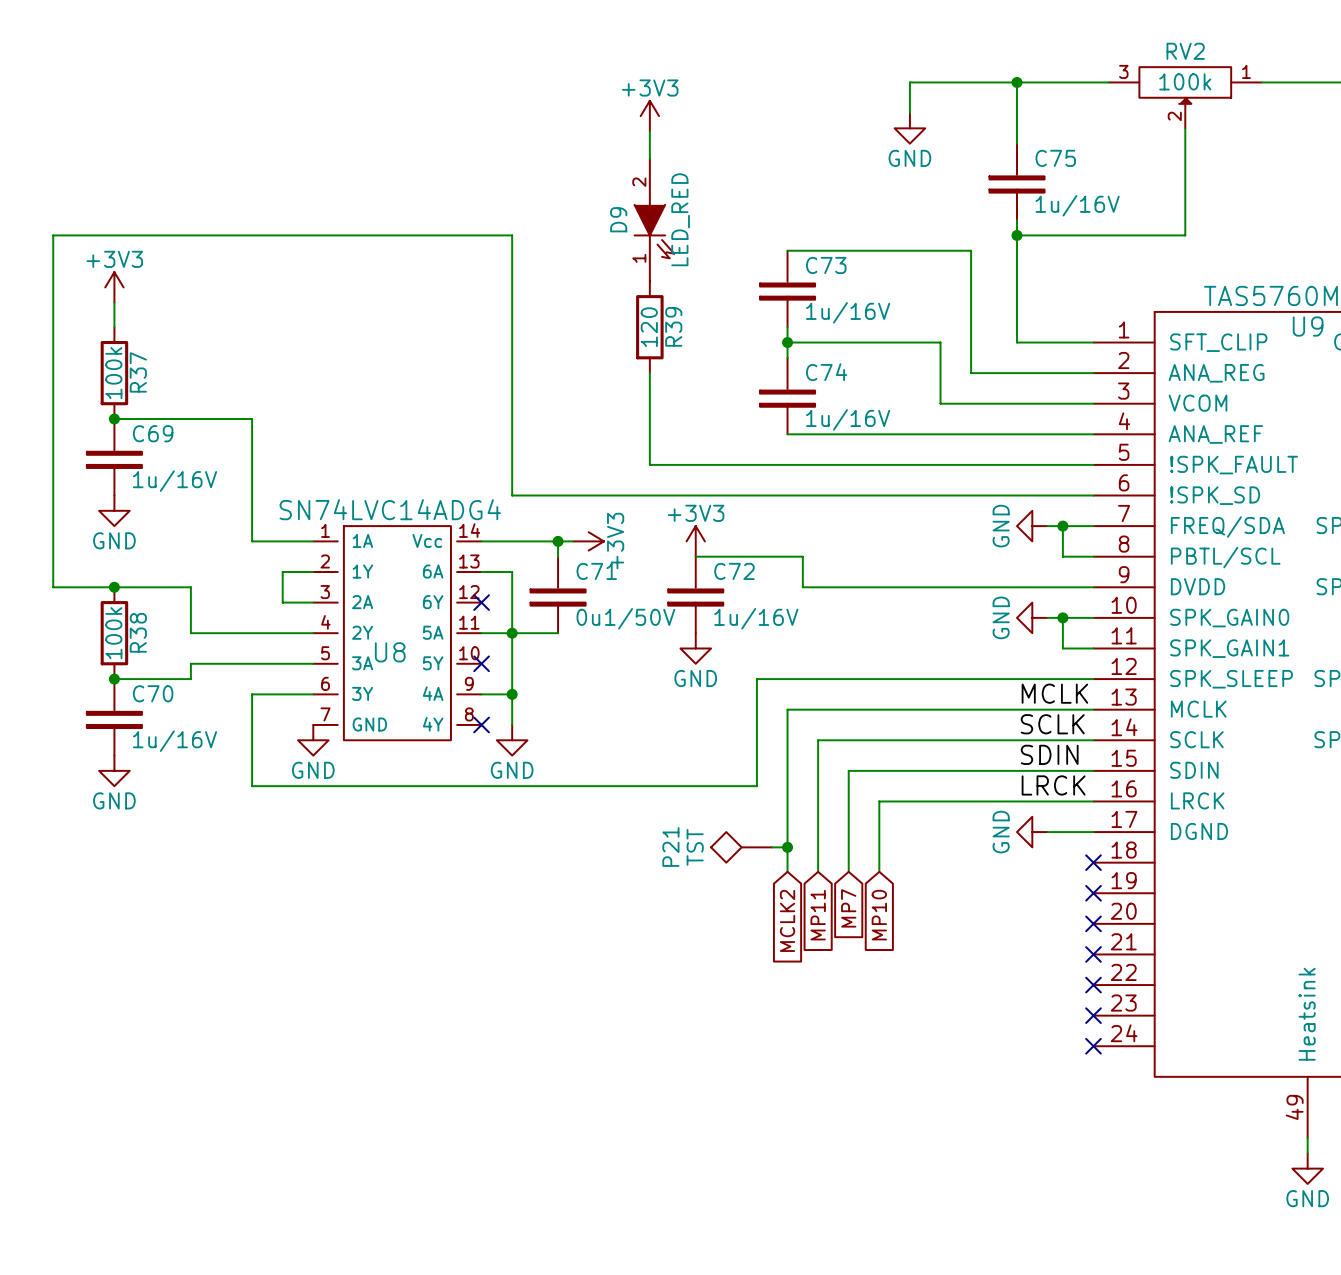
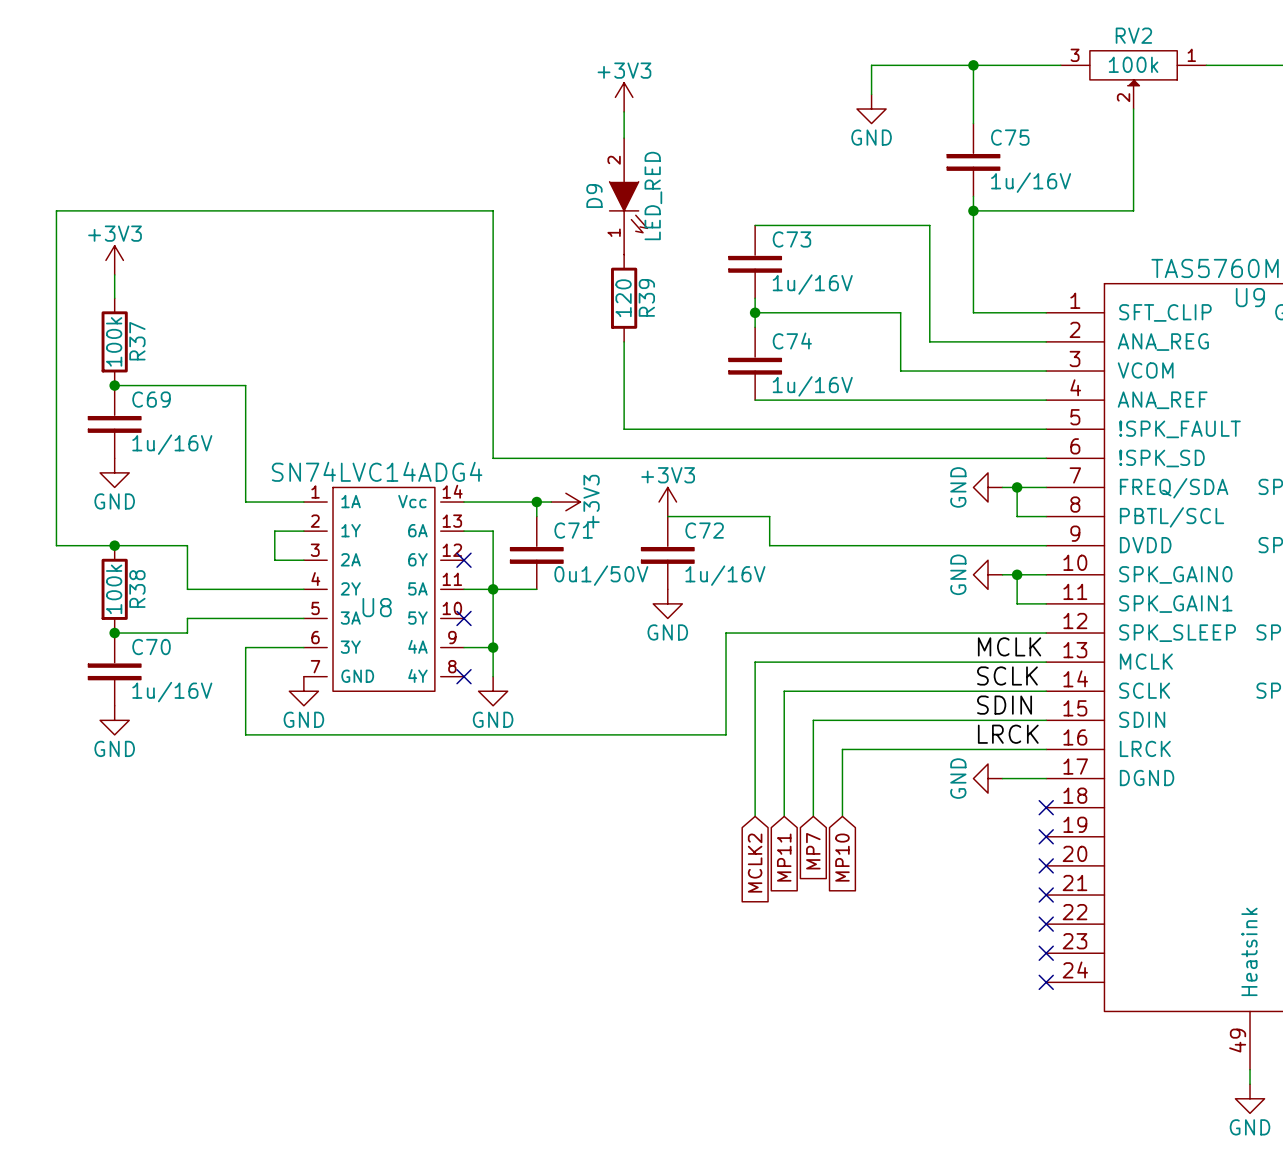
P21: TST (741, 847) -> none
wire: (772, 847) (787, 847) -> none
junction: (787, 847) -> none

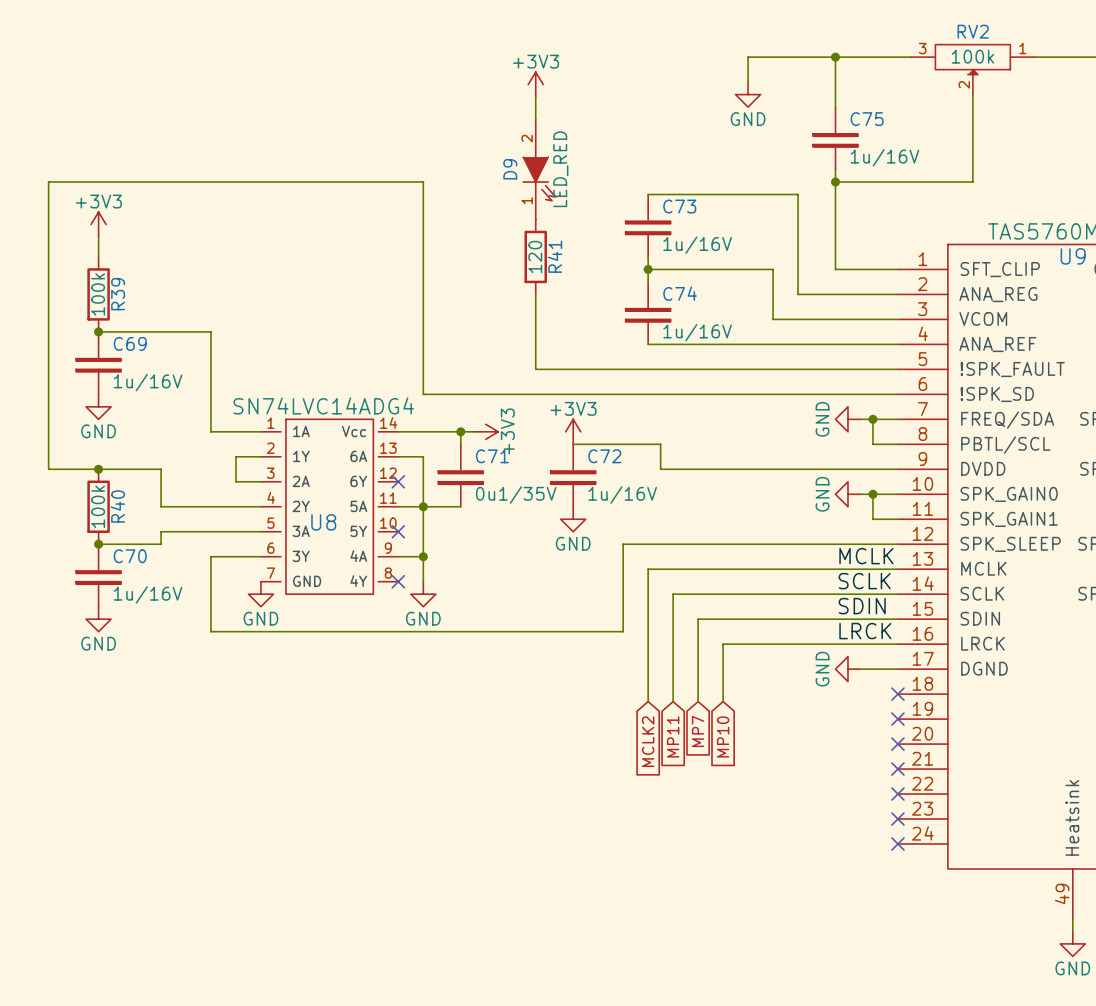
R39 name: R39 (646, 297) -> R41 (554, 256)
R37 name: R37 (137, 341) -> R39 (118, 294)
C71 value: 0u1/50V (601, 575) -> 0u1/35V (516, 495)
R38 name: R38 (137, 589) -> R40 (117, 506)

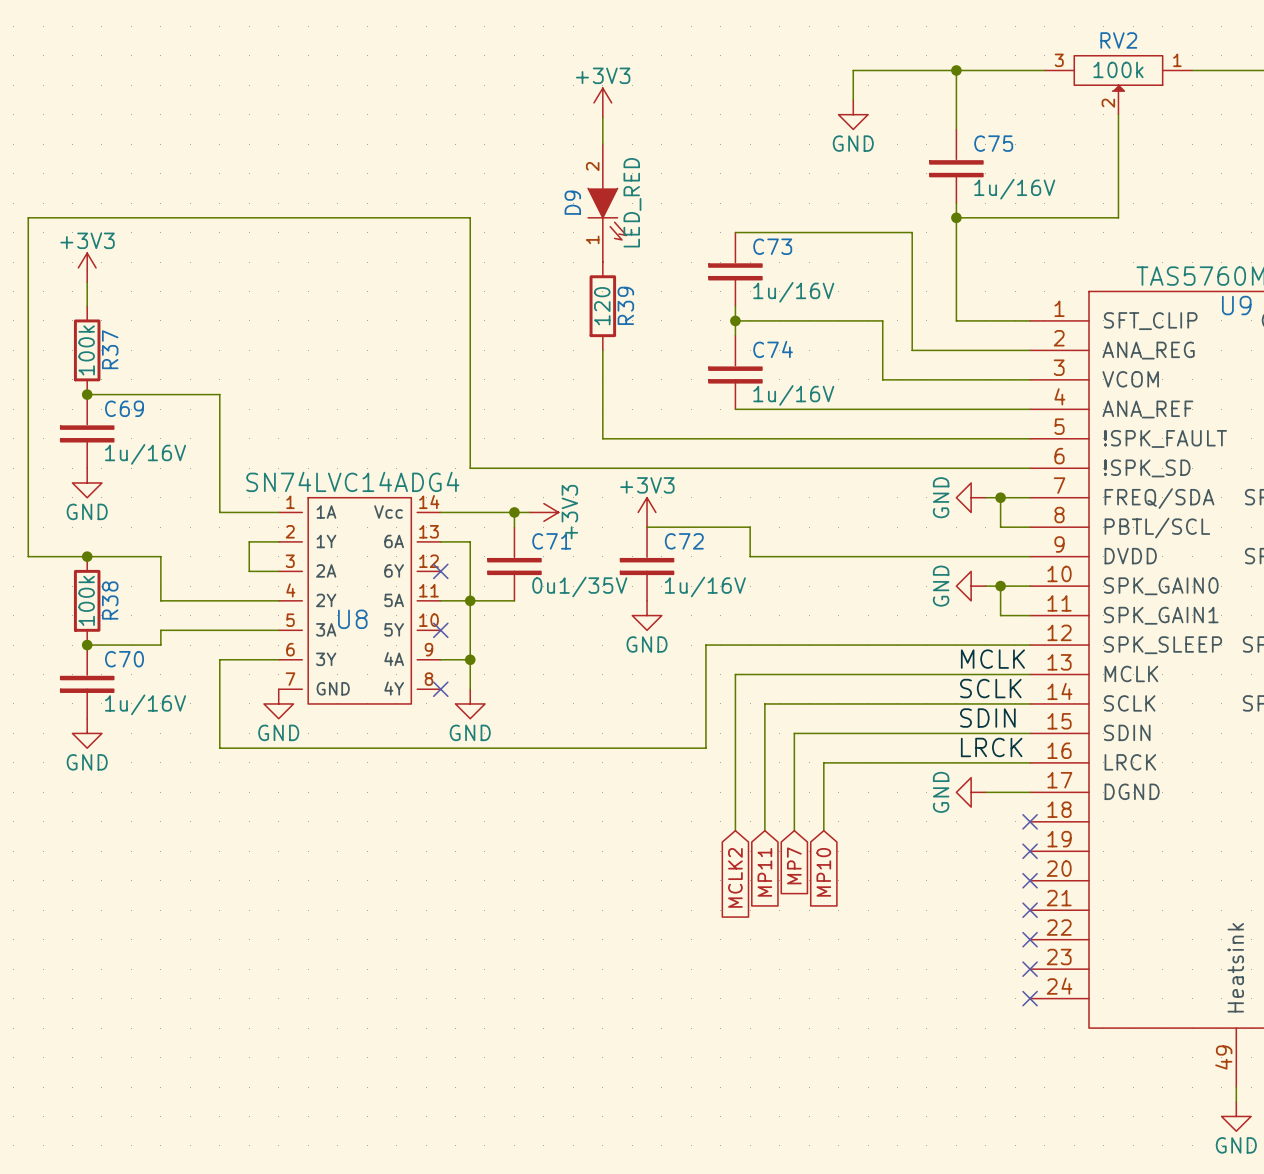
R41 name: R41 (554, 256) -> R39 (625, 305)
R39 name: R39 (118, 294) -> R37 (110, 349)
R40 name: R40 (117, 506) -> R38 (110, 600)

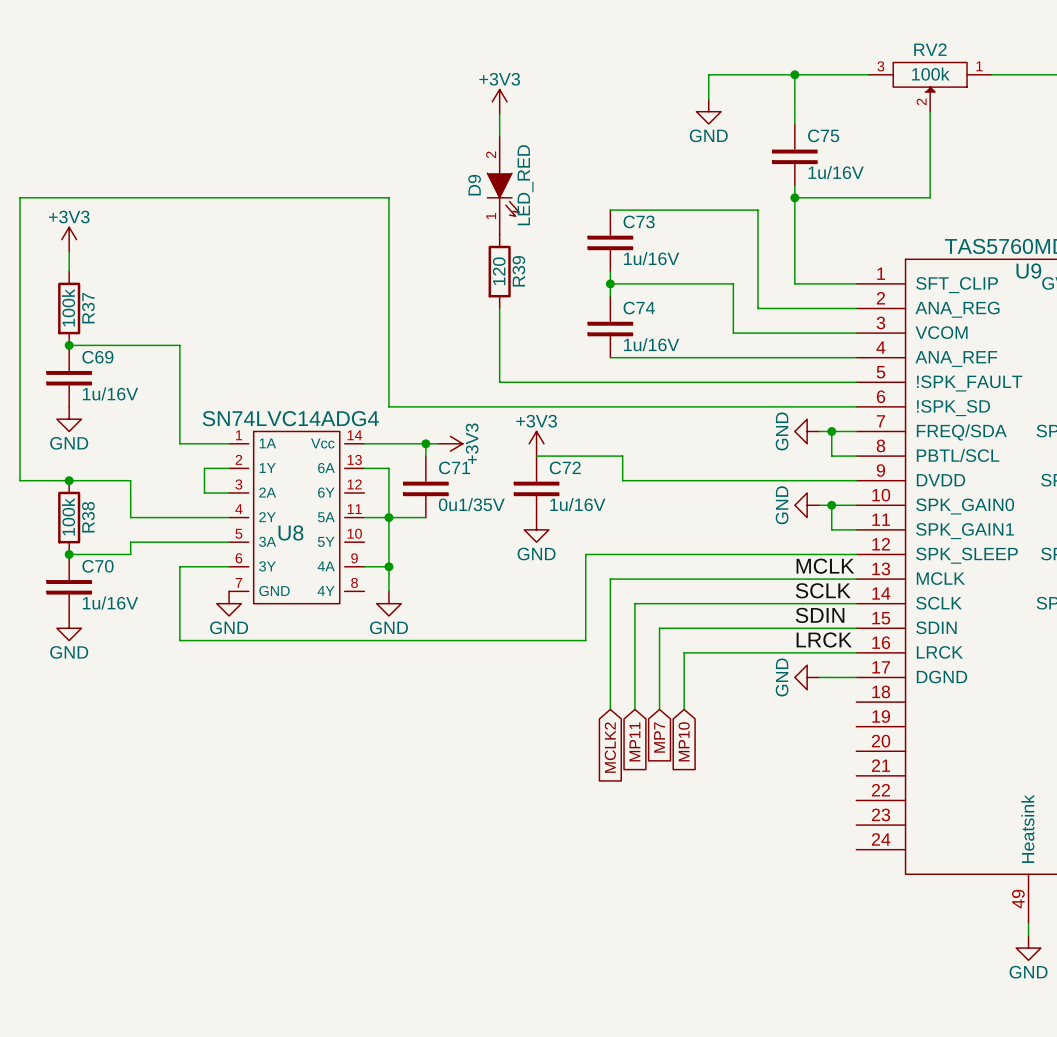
no-connect mark: (440, 571) -> none
no-connect mark: (440, 630) -> none
no-connect mark: (440, 689) -> none
no-connect mark: (1030, 821) -> none
no-connect mark: (1030, 851) -> none
no-connect mark: (1030, 880) -> none
no-connect mark: (1030, 910) -> none
no-connect mark: (1030, 939) -> none
no-connect mark: (1030, 969) -> none
no-connect mark: (1030, 998) -> none

